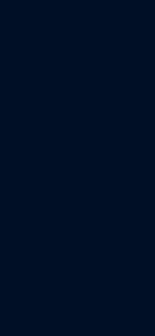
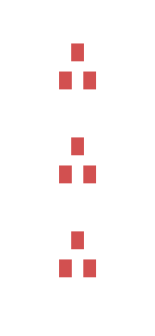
part: none -> (77, 66)
part: none -> (77, 160)
part: none -> (77, 254)

